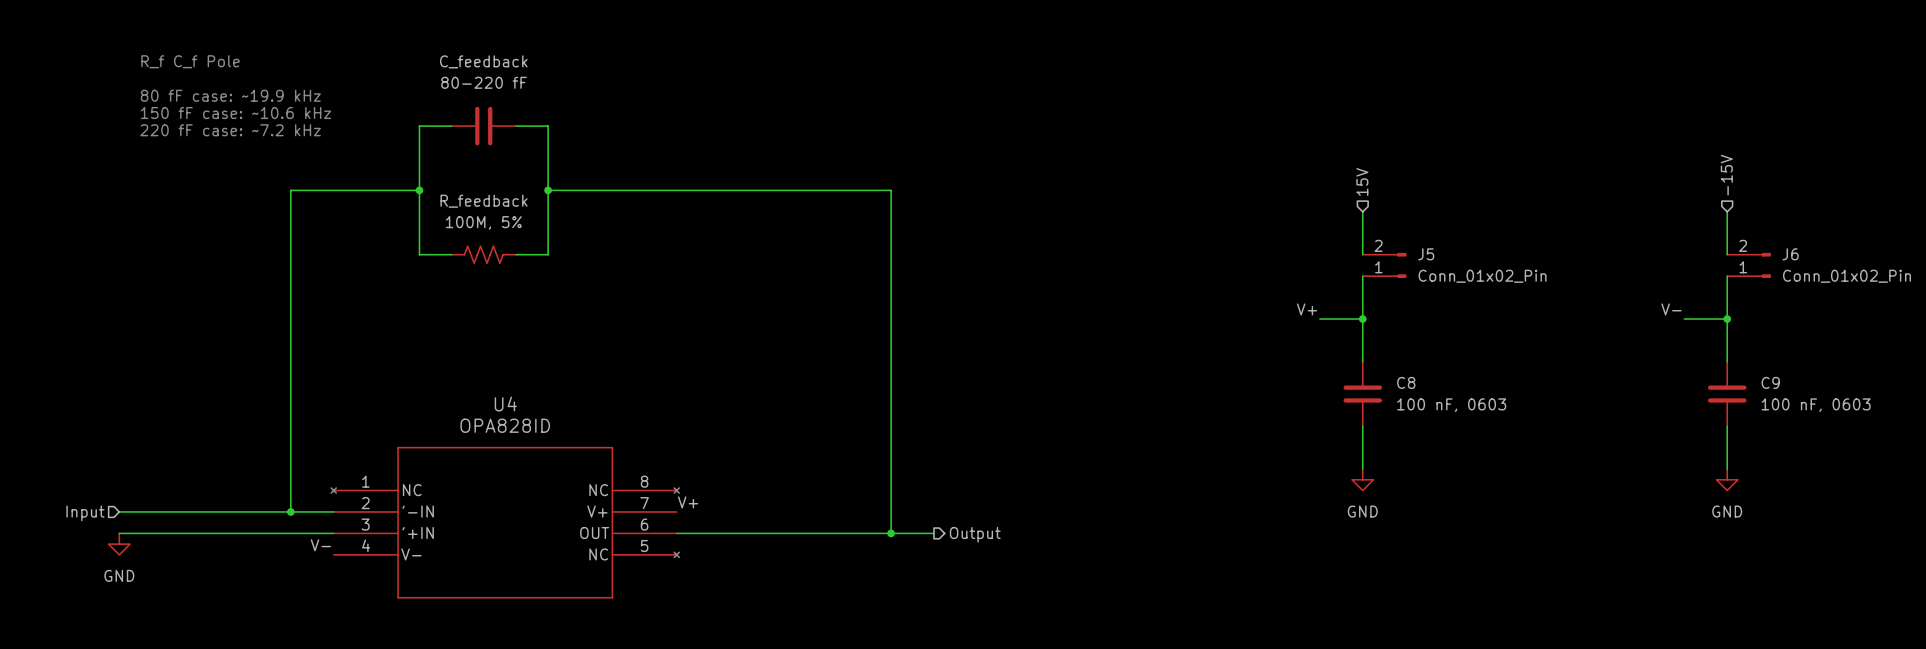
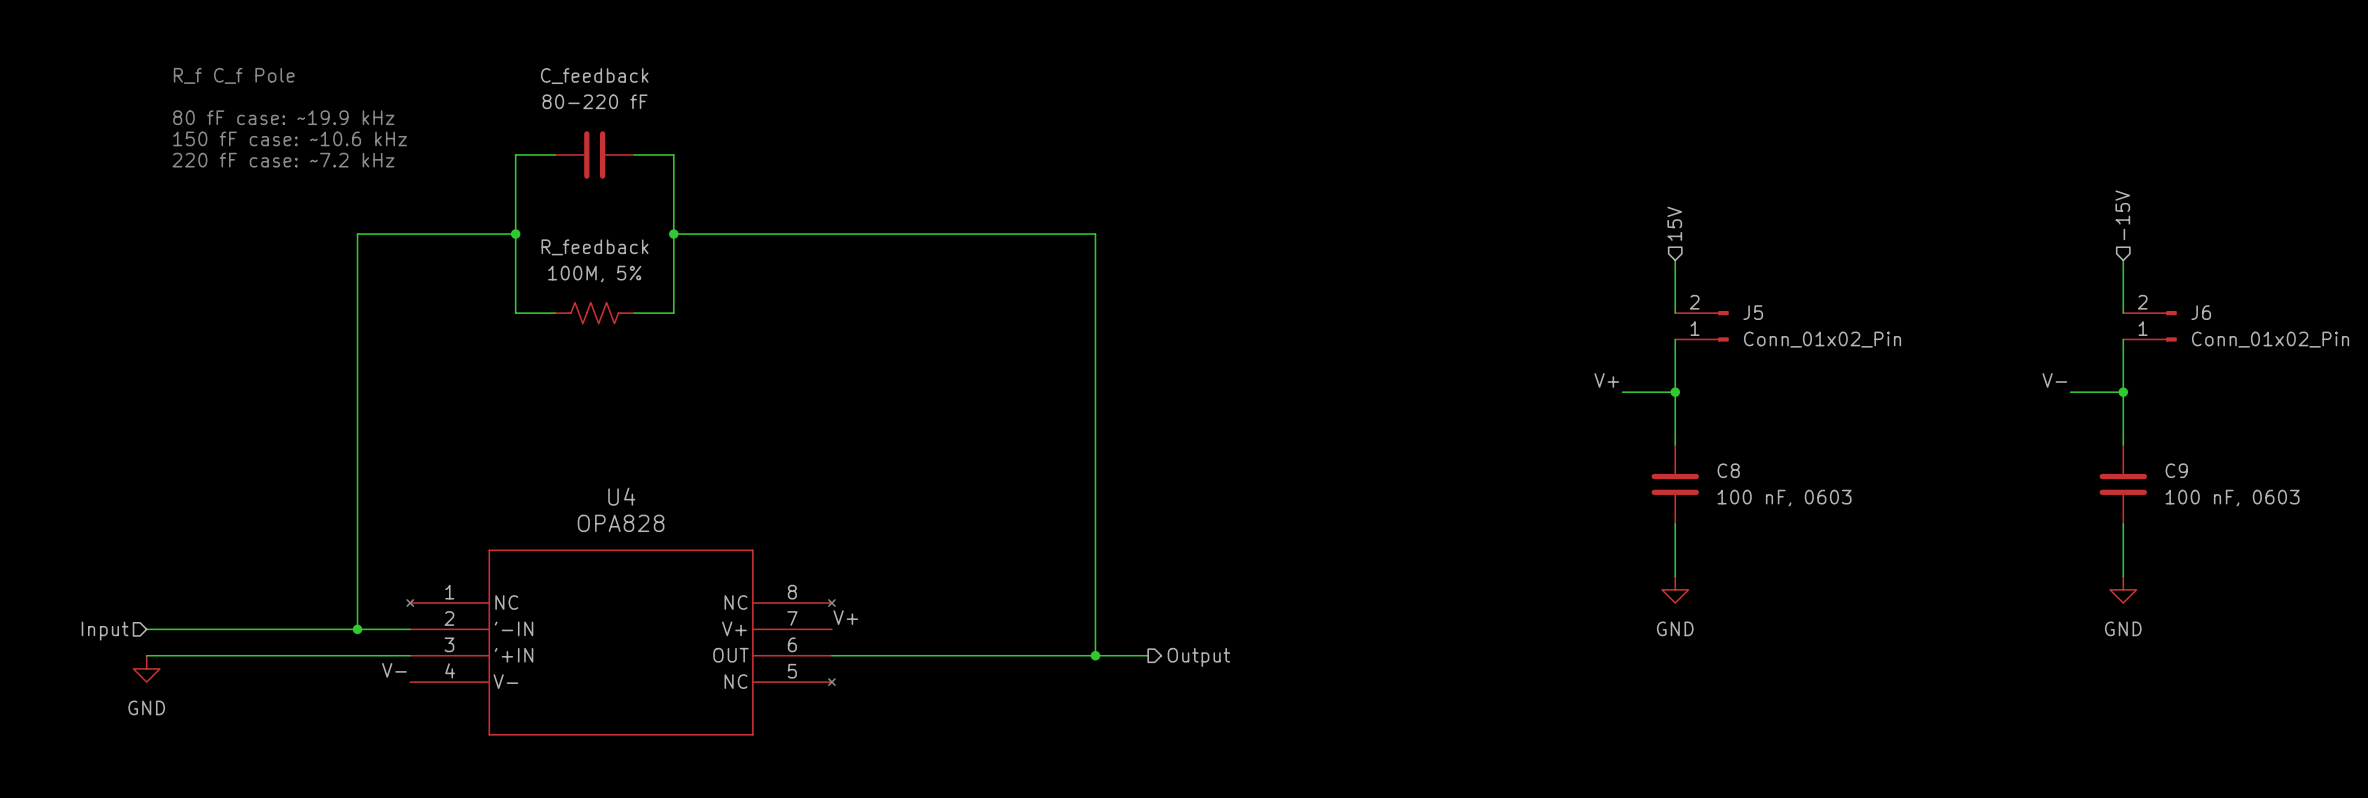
U4 value: OPA828ID (505, 425) -> OPA828 (621, 523)

